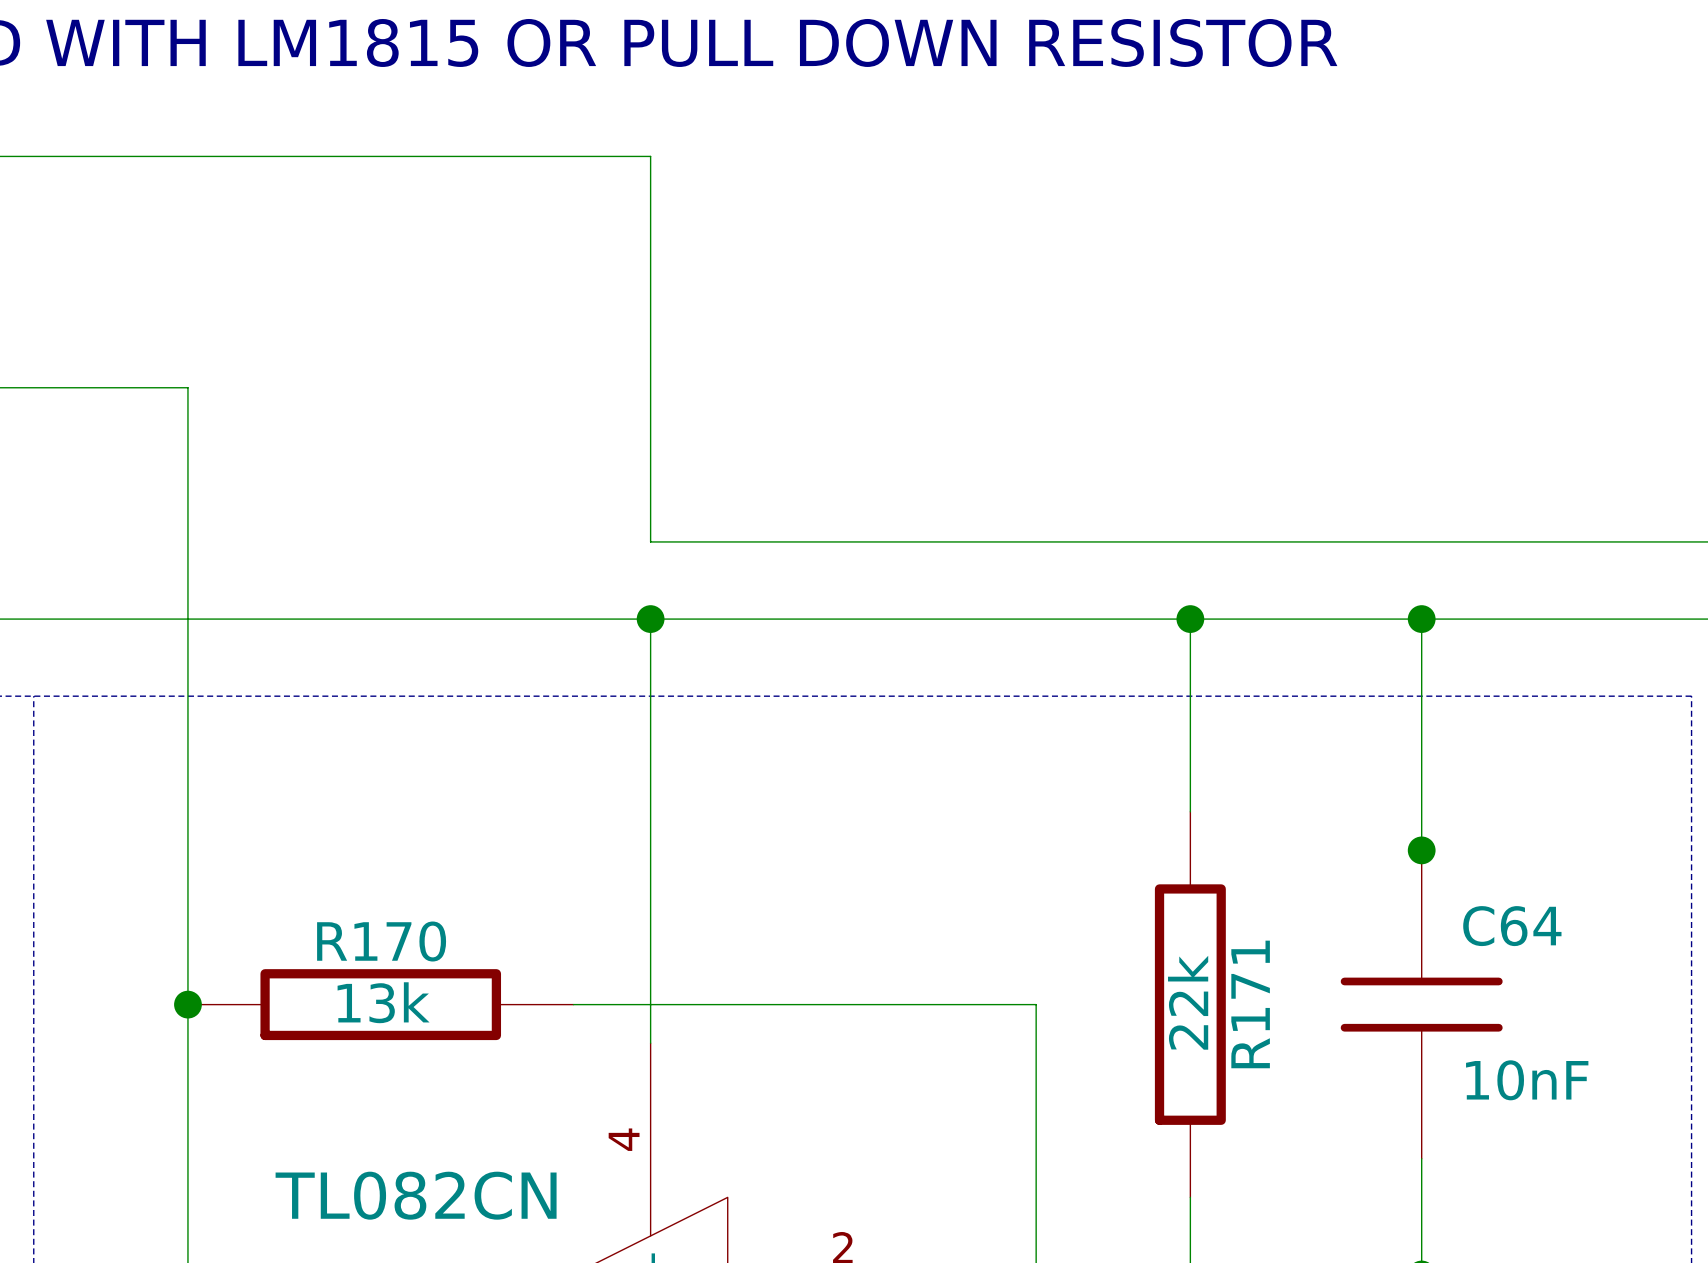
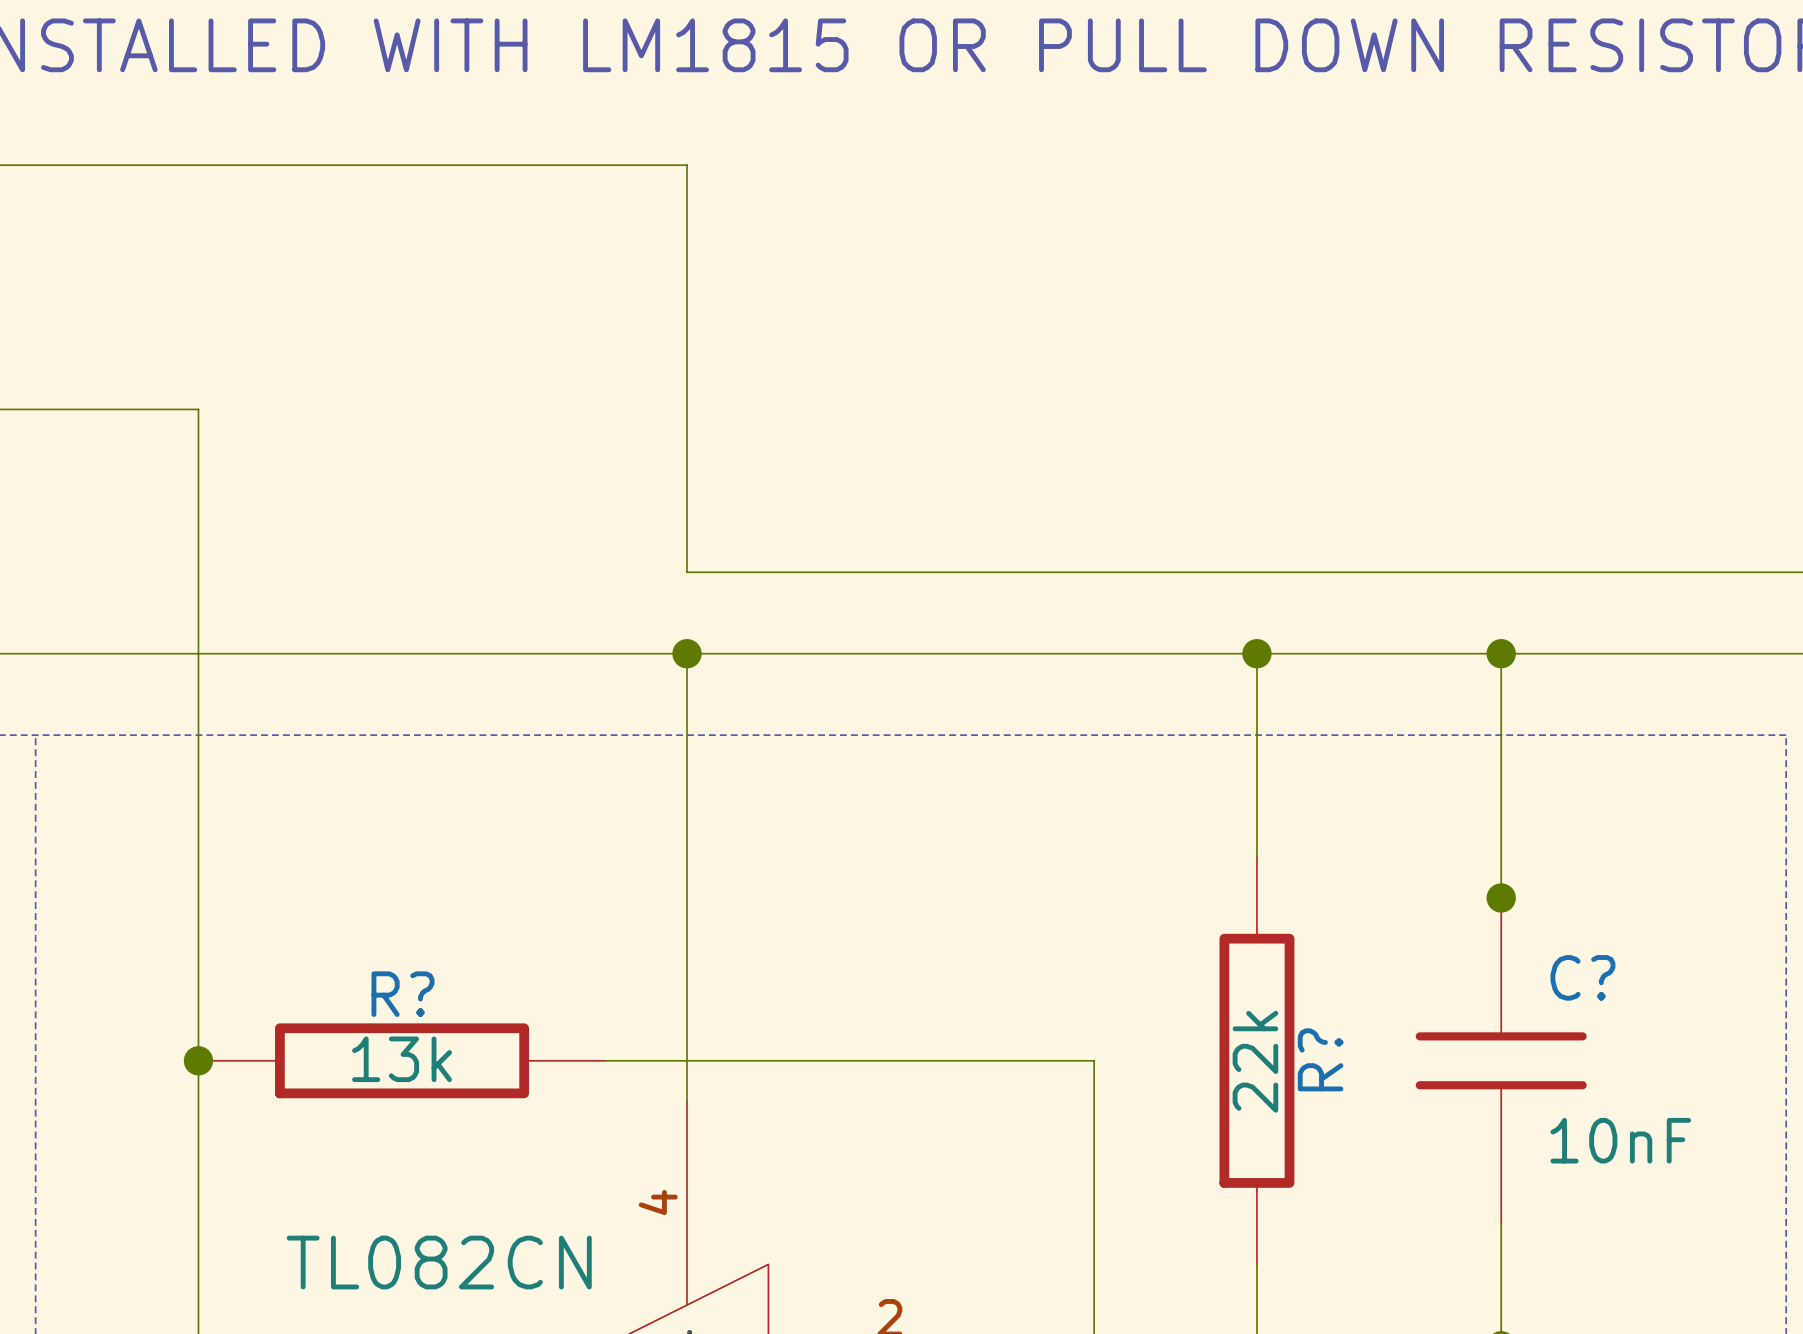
C64 name: C64 (1512, 926) -> C? (1582, 977)
R170 name: R170 (381, 941) -> R? (403, 994)
R171 name: R171 (1250, 1004) -> R? (1320, 1059)

